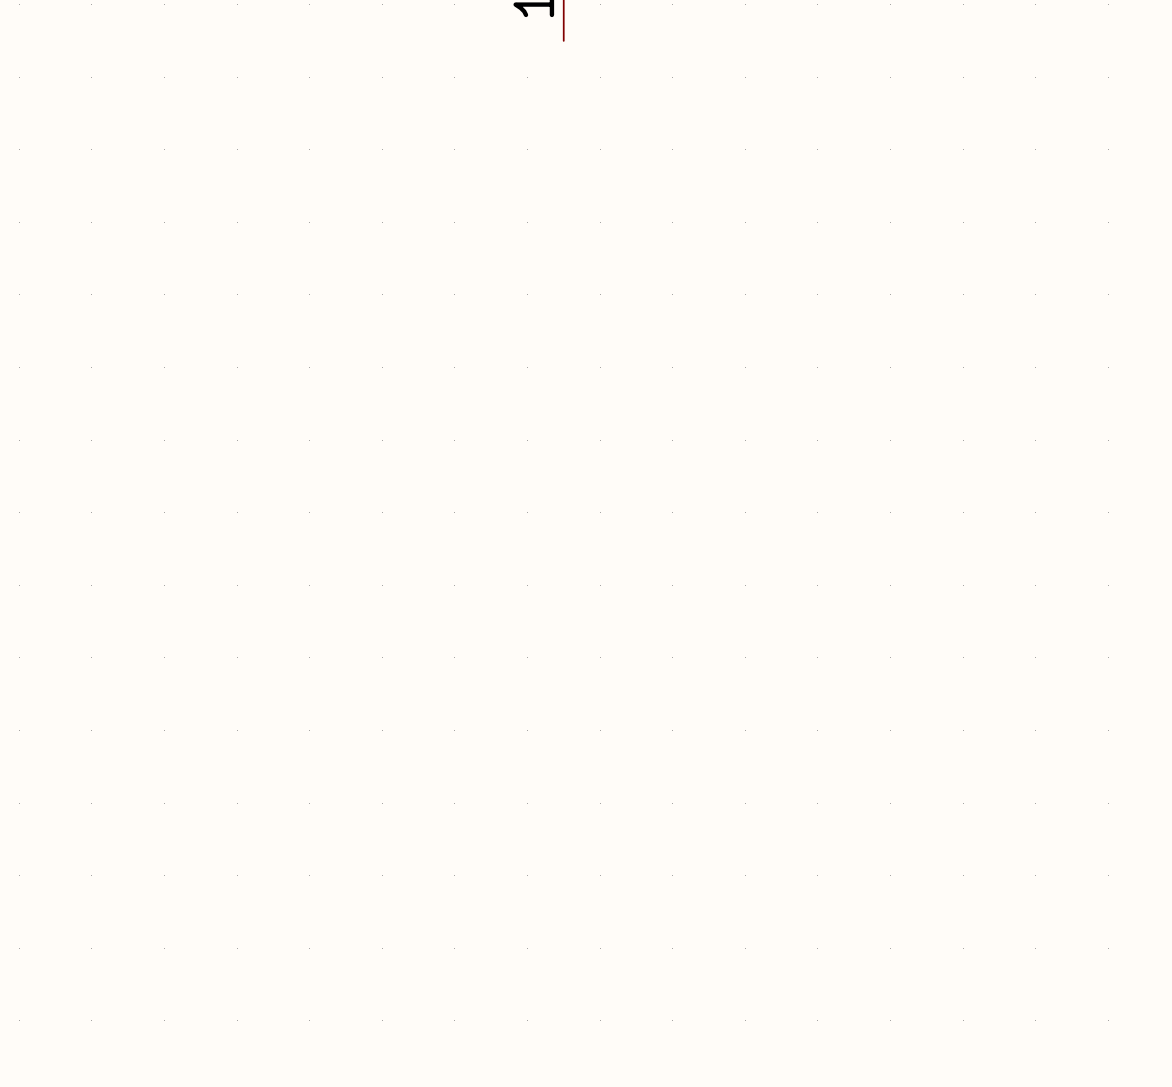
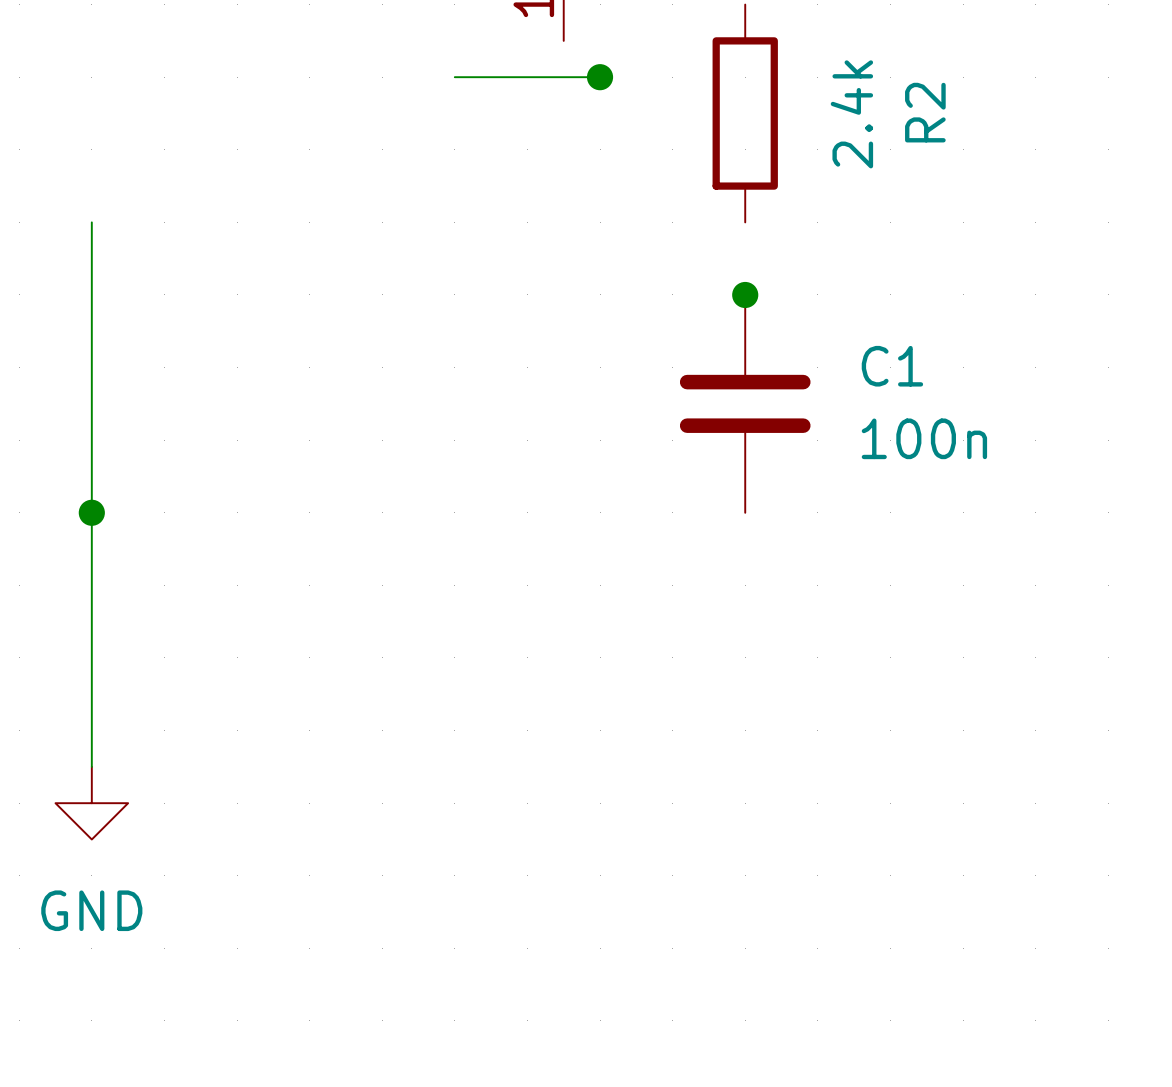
wire: none -> (454, 77) (600, 77)
junction: none -> (600, 77)
R2: none -> 2.4k (745, 113)
wire: none -> (91, 222) (91, 766)
junction: none -> (745, 294)
C1: none -> 100n (745, 403)
junction: none -> (91, 512)
power symbol: none -> GND (91, 803)

